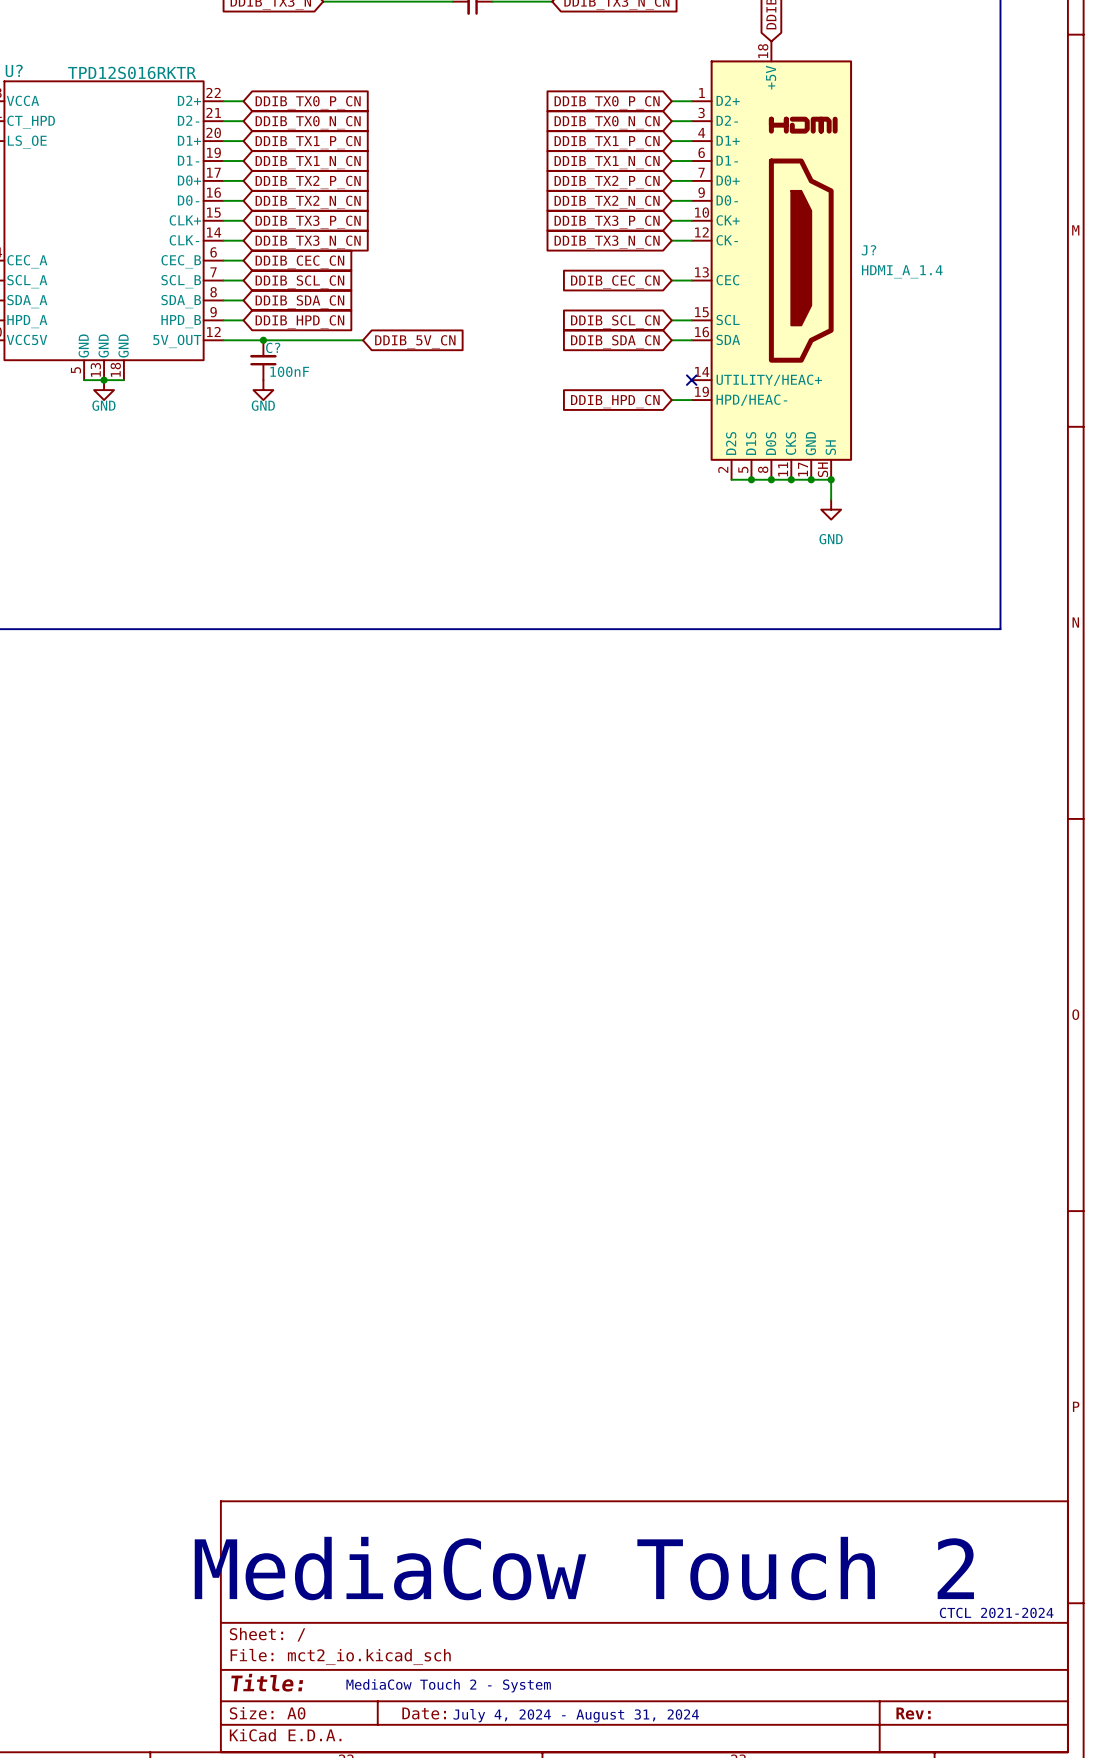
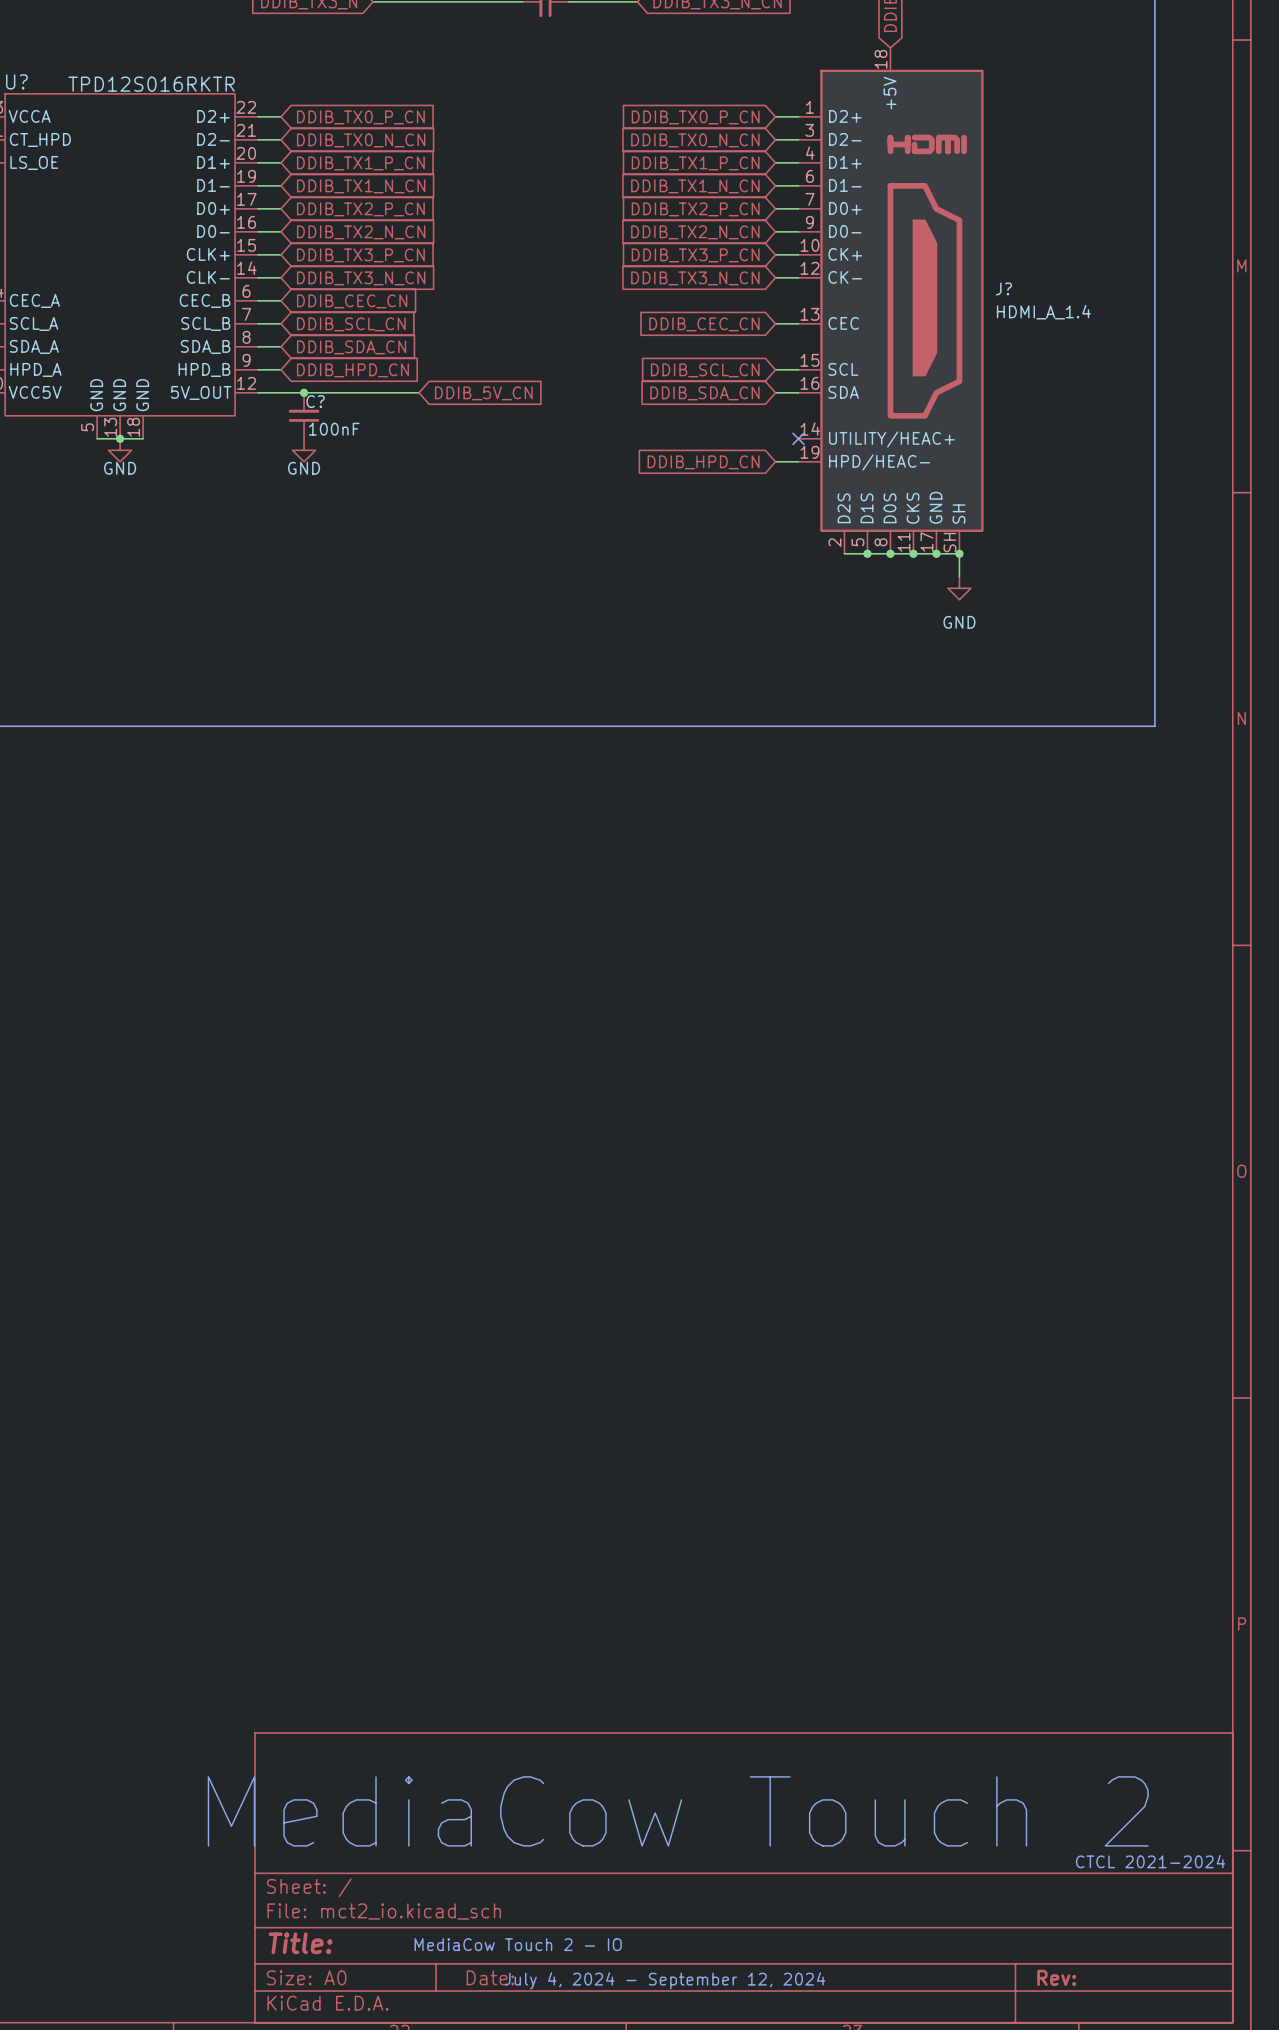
text: MediaCow Touch 2 - System (448, 1685) -> MediaCow Touch 2 - IO (518, 1944)
text: July 4, 2024 - August 31, 2024 (576, 1715) -> July 4, 2024 - September 12, 2024 (665, 1980)

